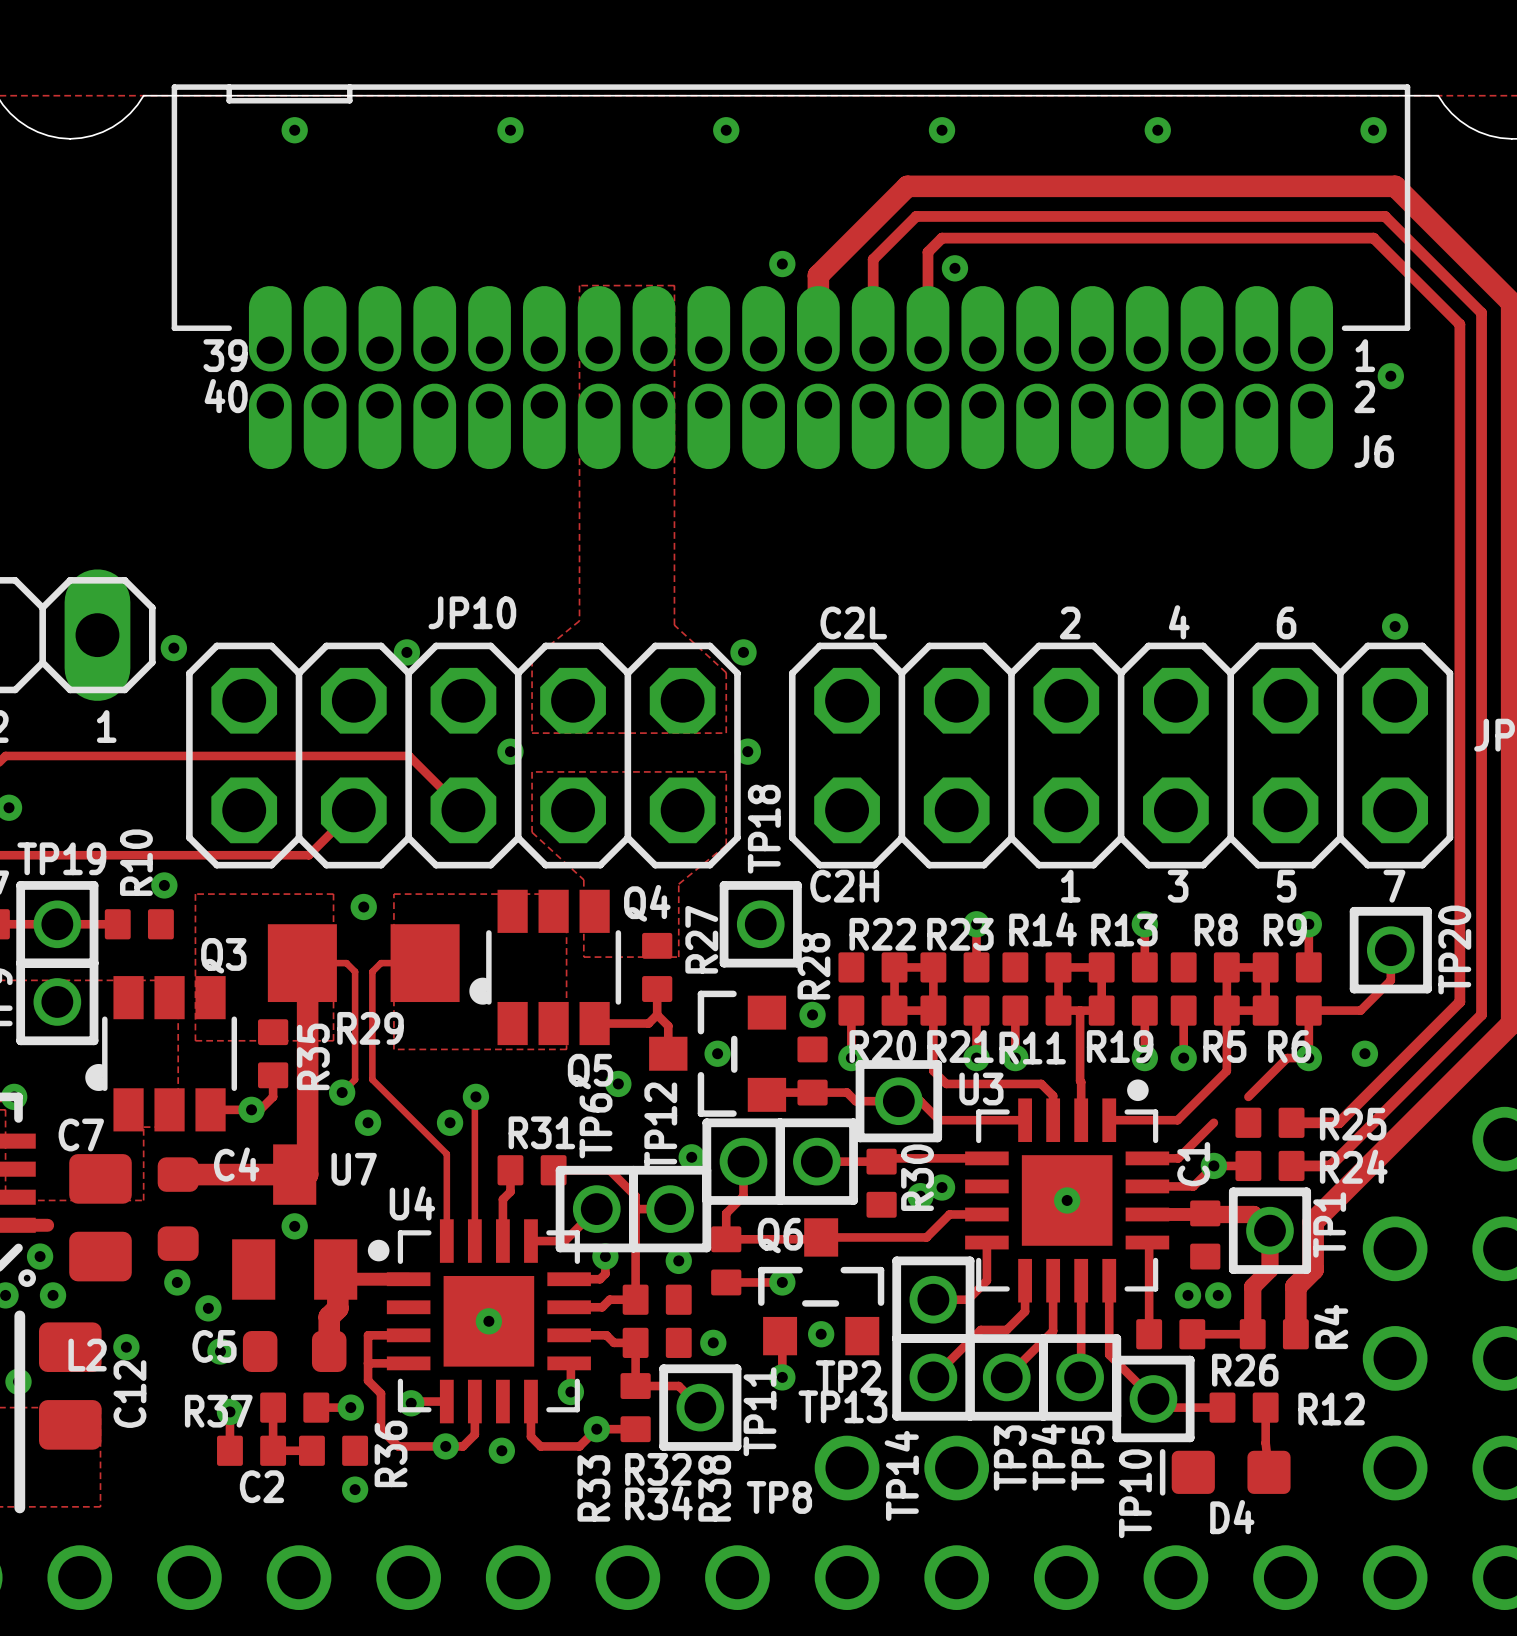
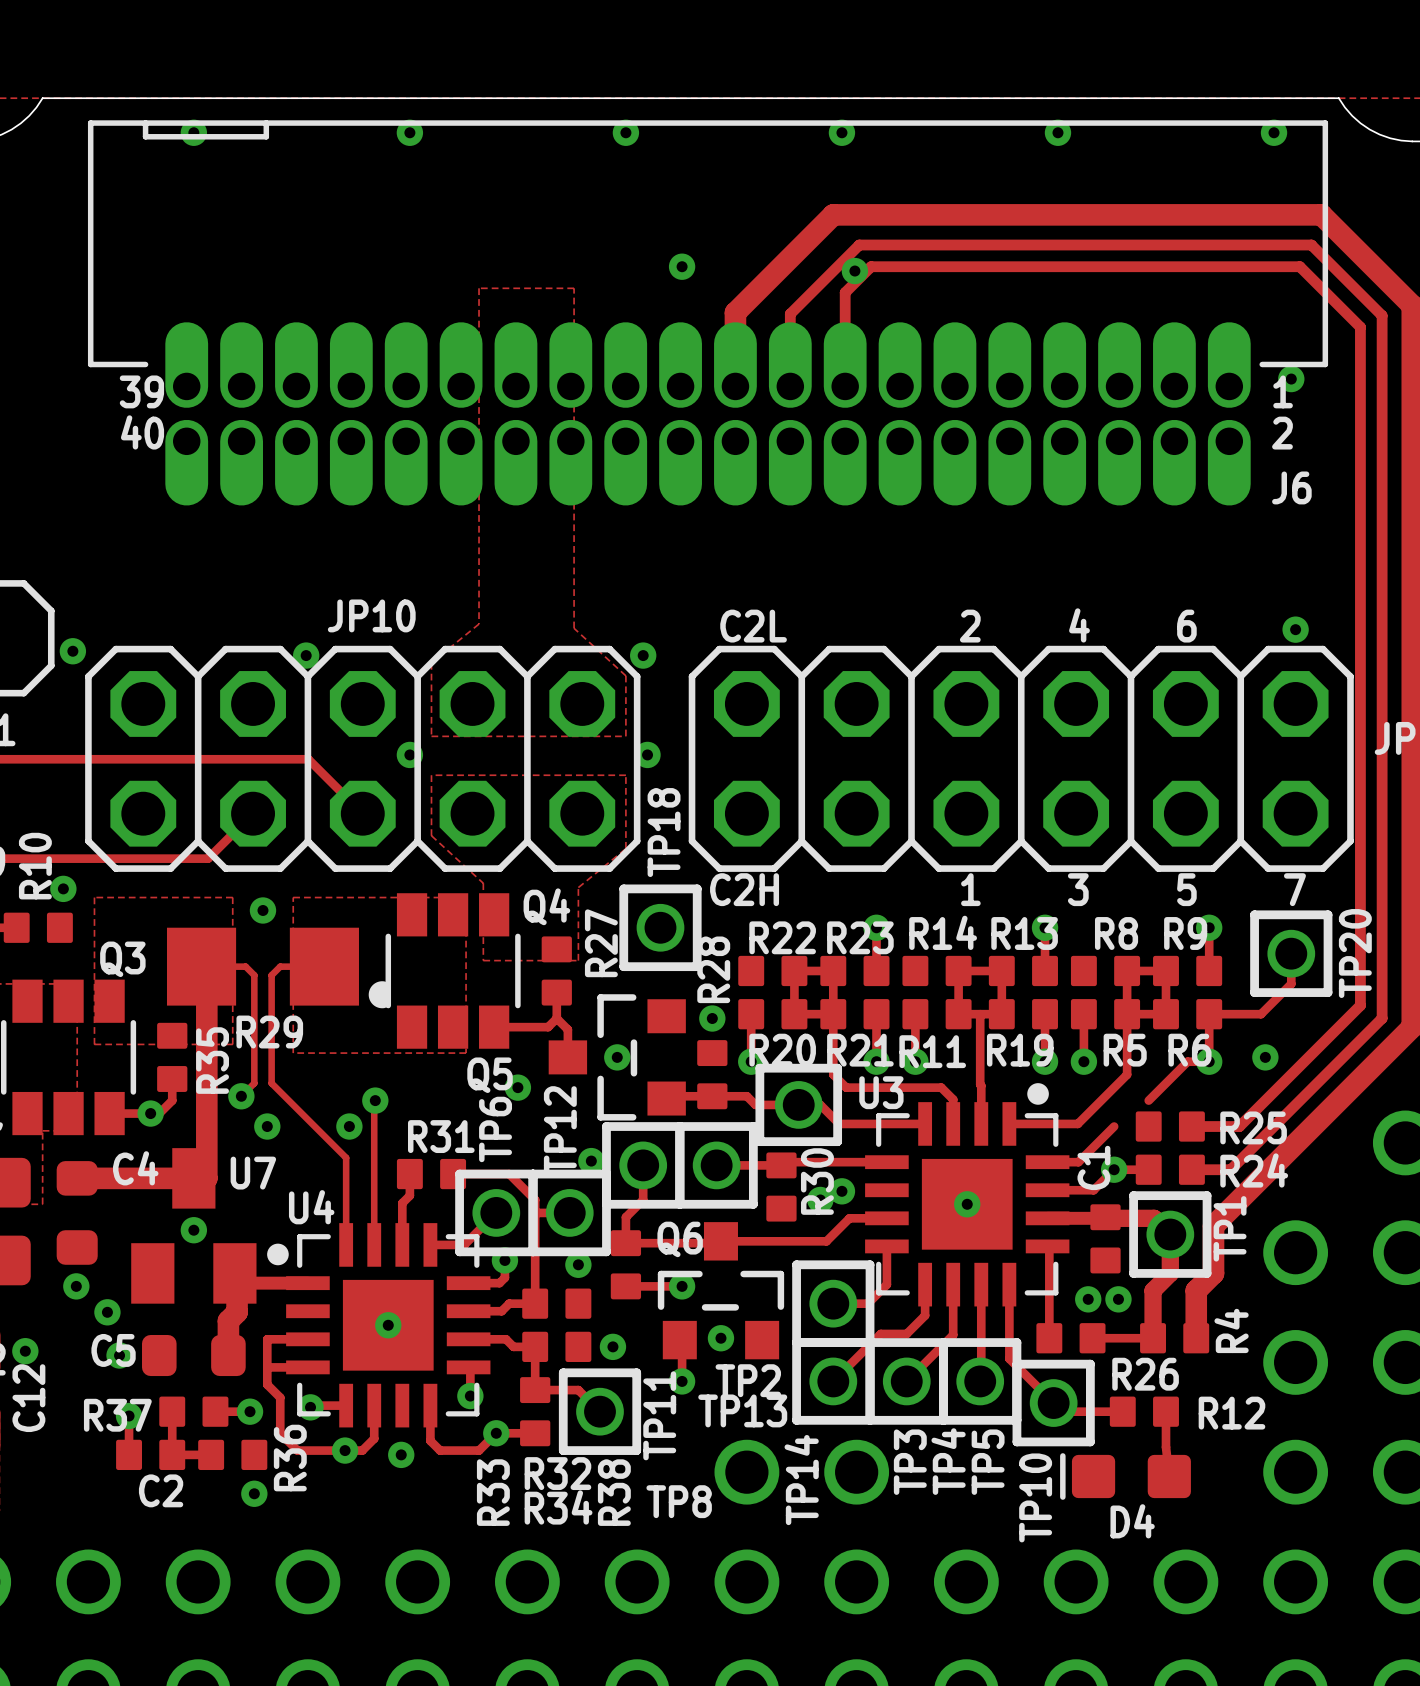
track: (1421, 212) (1395, 186) (907, 186) (818, 275) (818, 350) -> (1321, 214) (833, 214) (735, 312) (735, 386)
track: (1410, 242) (1385, 216) (916, 216) (873, 259) (873, 350) -> (1311, 245) (859, 245) (790, 314) (790, 386)
track: (1399, 264) (1373, 238) (942, 238) (927, 252) (927, 350) -> (1299, 266) (871, 266) (845, 292) (845, 386)
J6 position: (790, 276) -> (708, 312)

